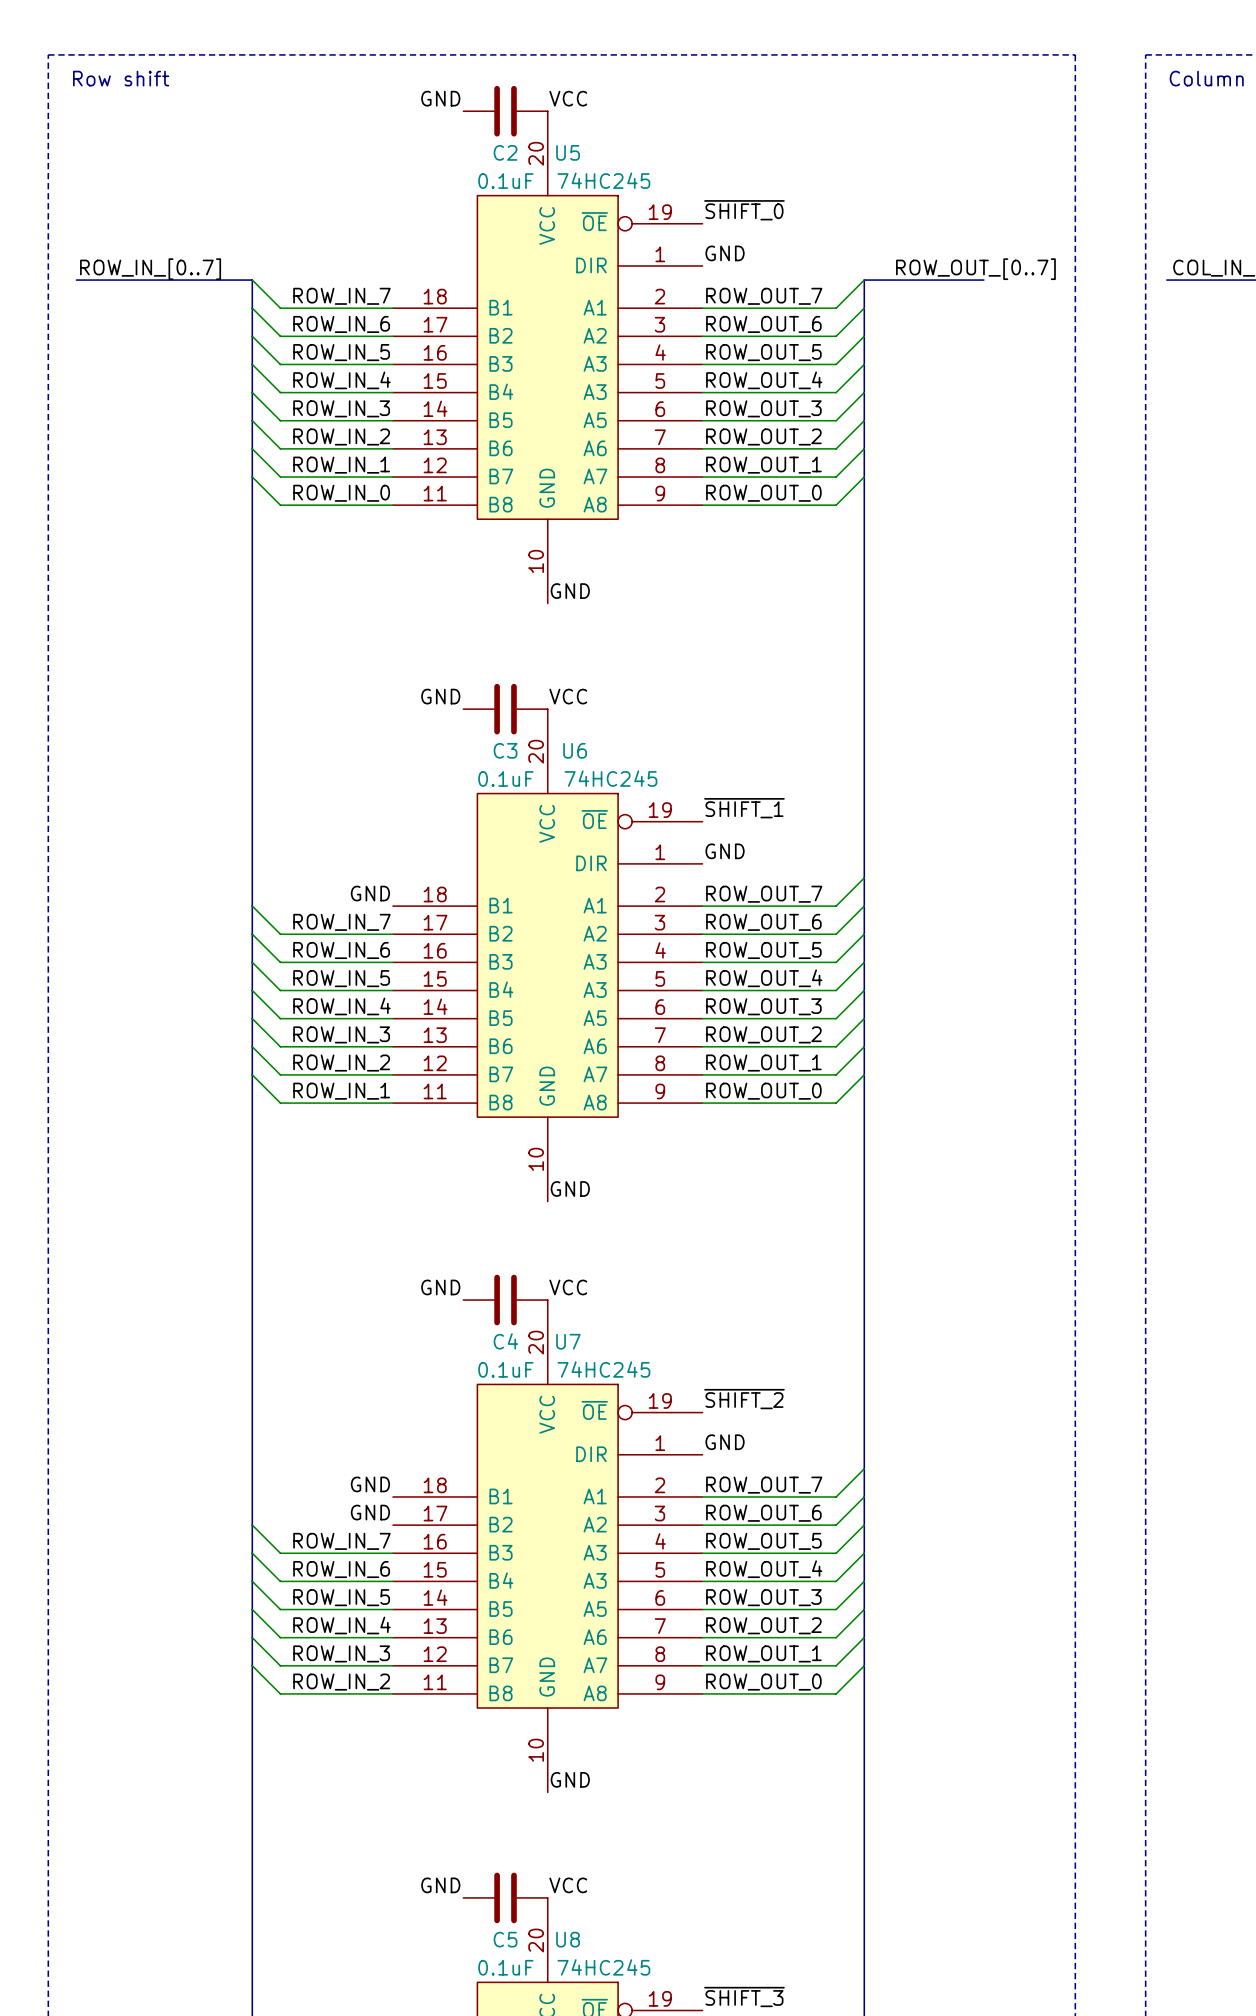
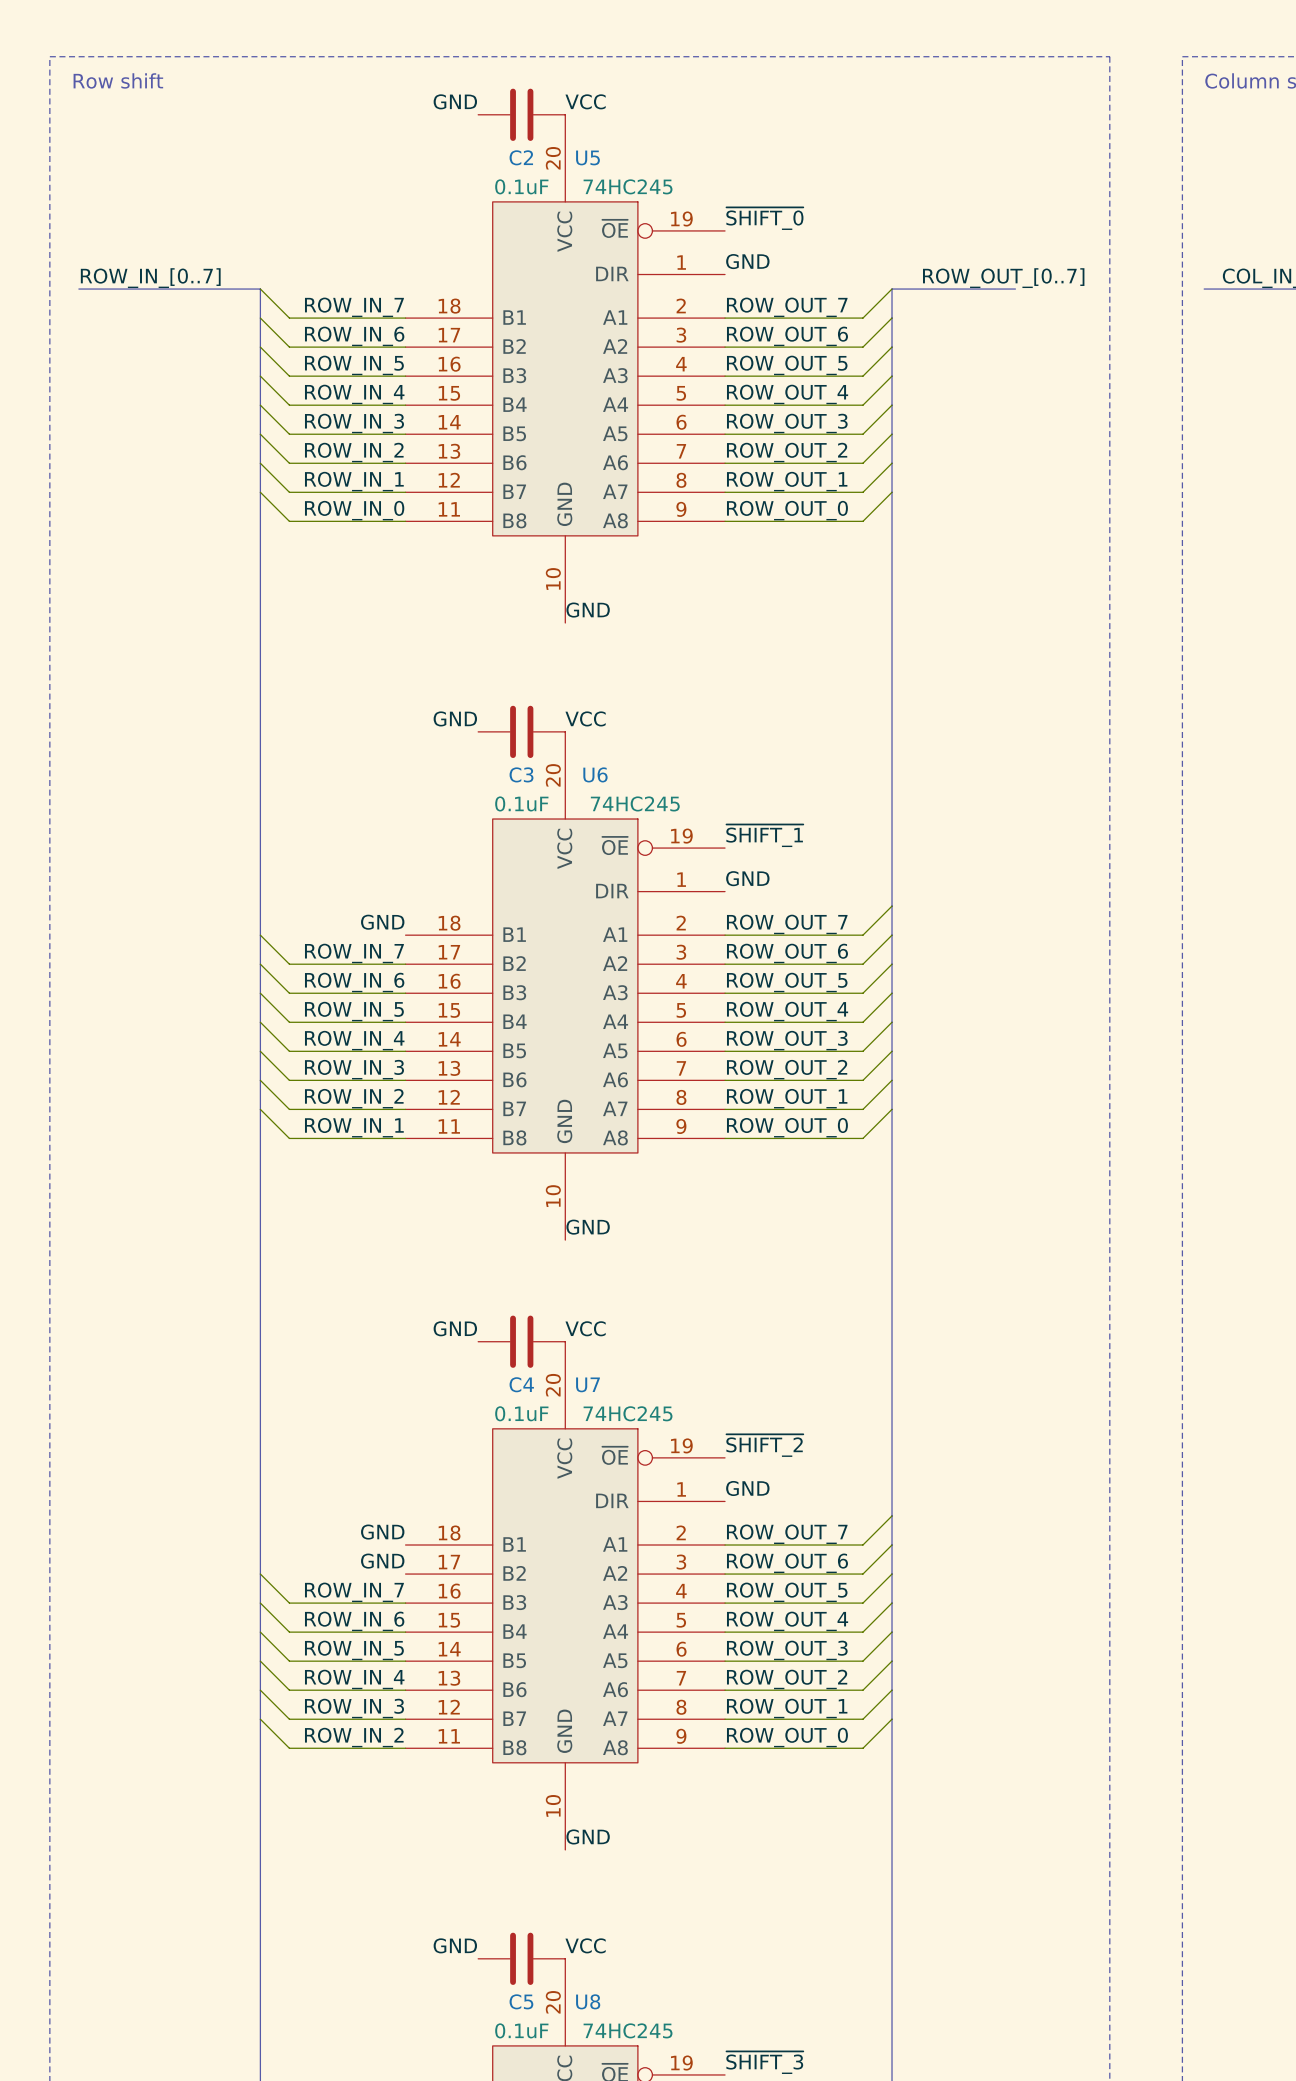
U5 pin name: A3 (595, 392) -> A4 (615, 404)
U6 pin name: A3 (595, 989) -> A4 (615, 1021)
U7 pin name: A3 (595, 1580) -> A4 (615, 1631)

